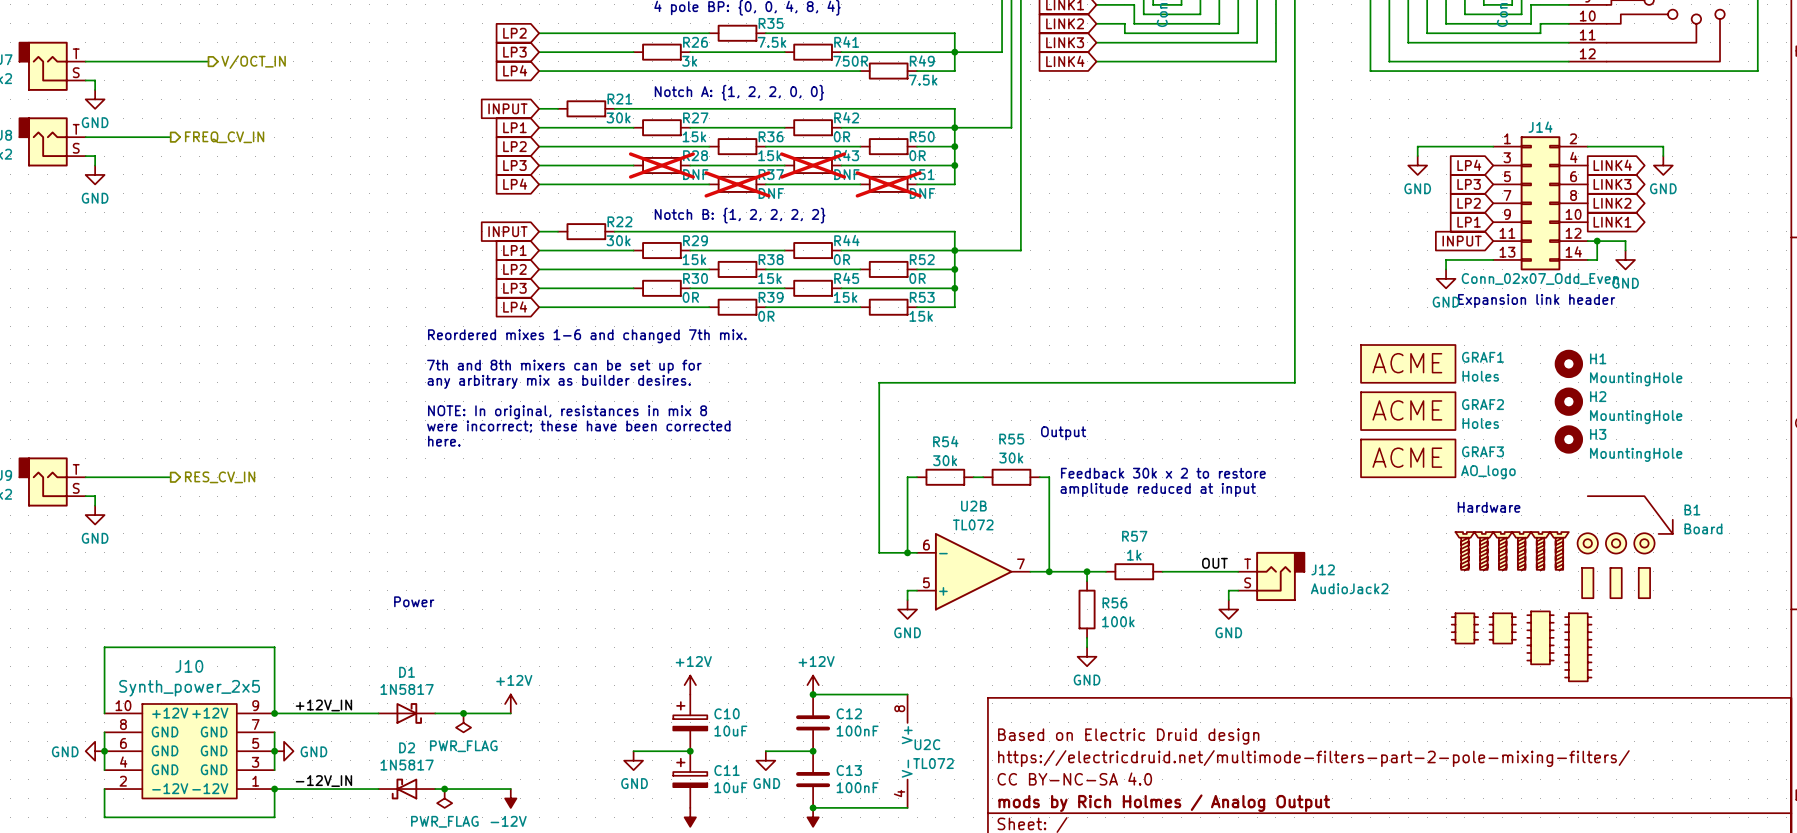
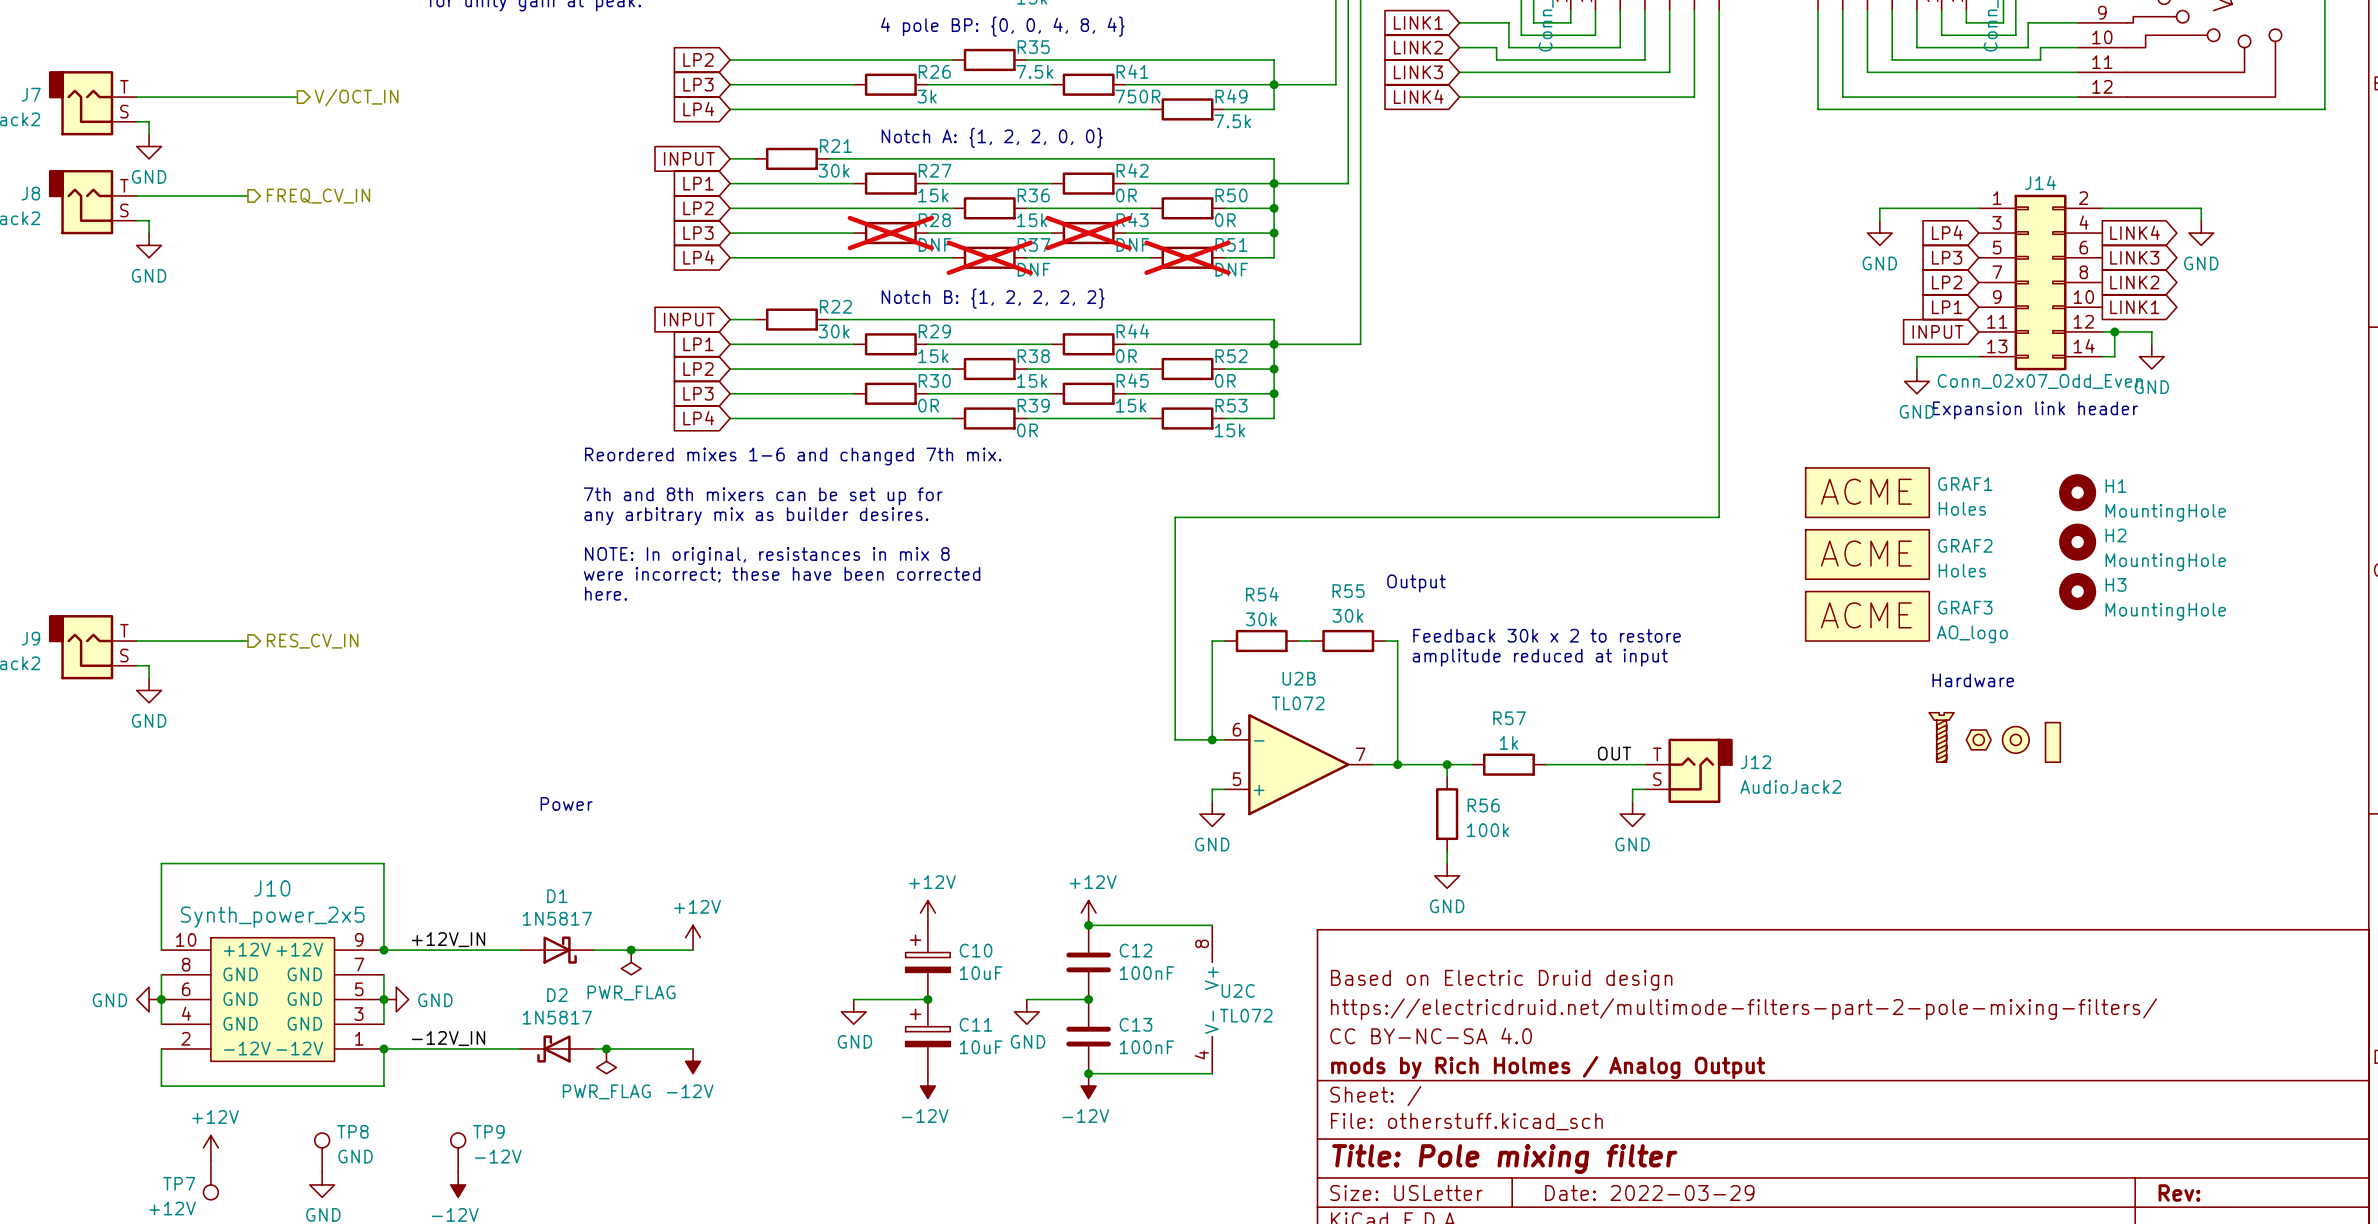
B1: Board (1630, 515) -> none
part symbol: [1512, 532, 1532, 570] -> [2002, 726, 2030, 754]
part: (1587, 543) -> none
part: (1616, 543) -> none
part: (1644, 543) -> none
part: (1483, 550) -> none
part: (1502, 550) -> none
part: (1540, 550) -> none
part: (1559, 550) -> none
part: none -> (1978, 739)
part: none -> (2052, 742)
part: (1587, 583) -> none
part: (1616, 583) -> none
part: (1644, 583) -> none
part: (1464, 628) -> none
part: (1502, 628) -> none
part: (1540, 637) -> none
part: (1578, 647) -> none

